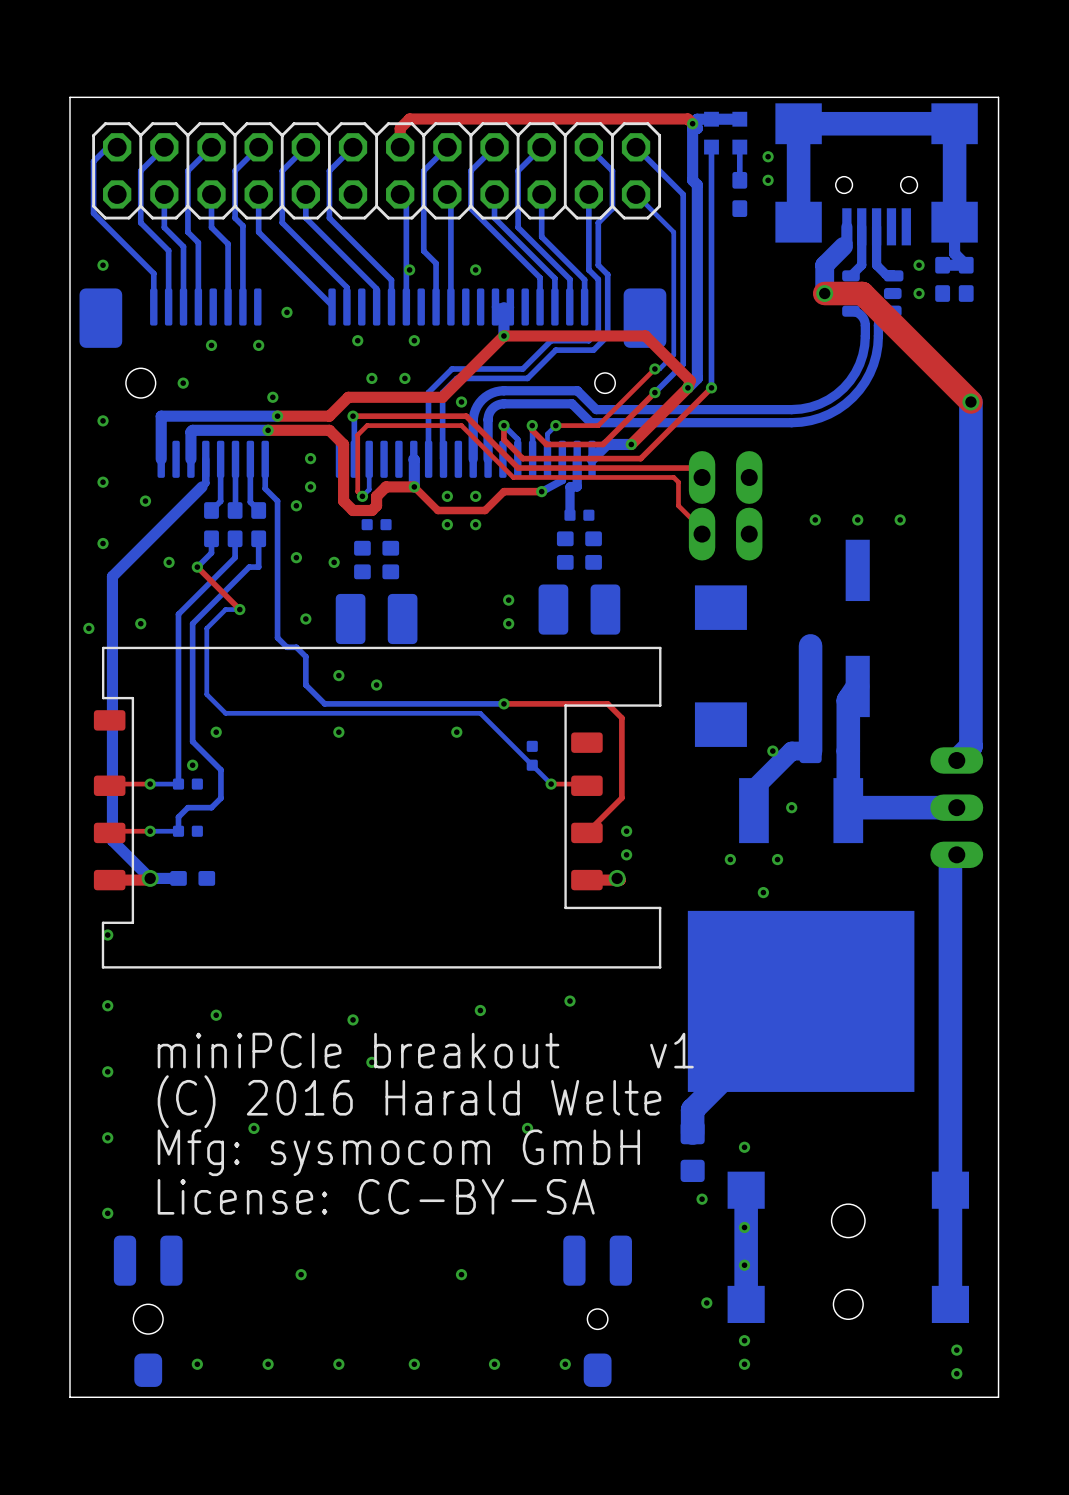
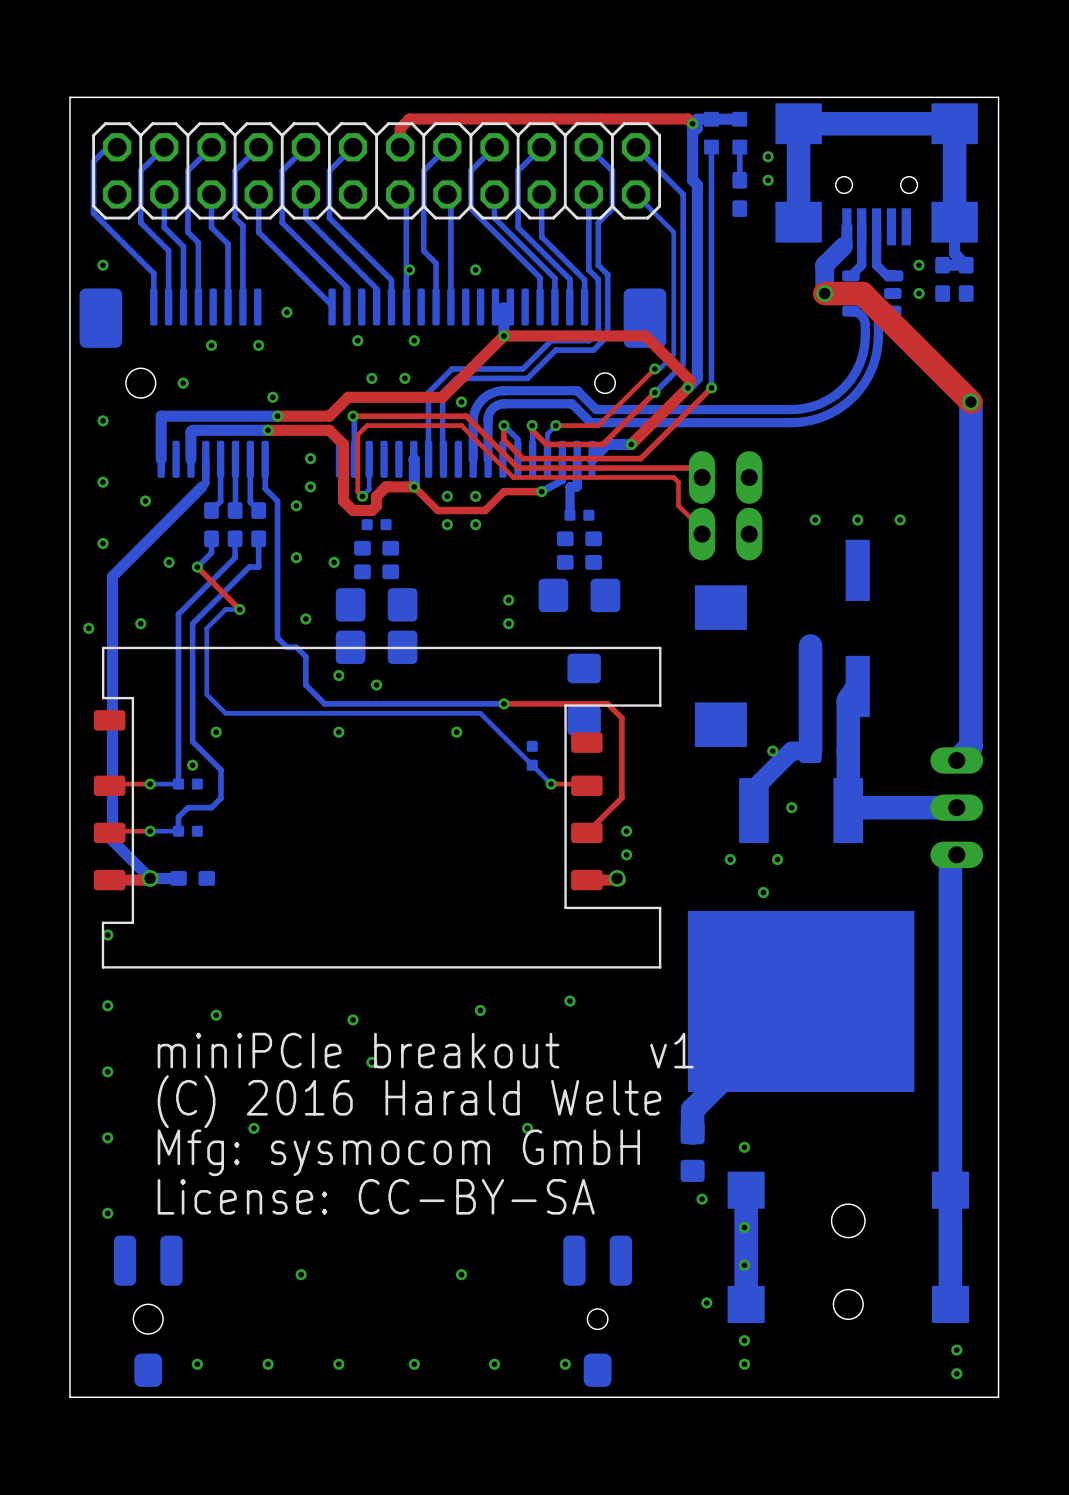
part footprint: [538, 584, 621, 635] -> [538, 578, 621, 613]
part: none -> (376, 604)
part: (376, 618) -> none
part: none -> (376, 647)
part: none -> (584, 694)

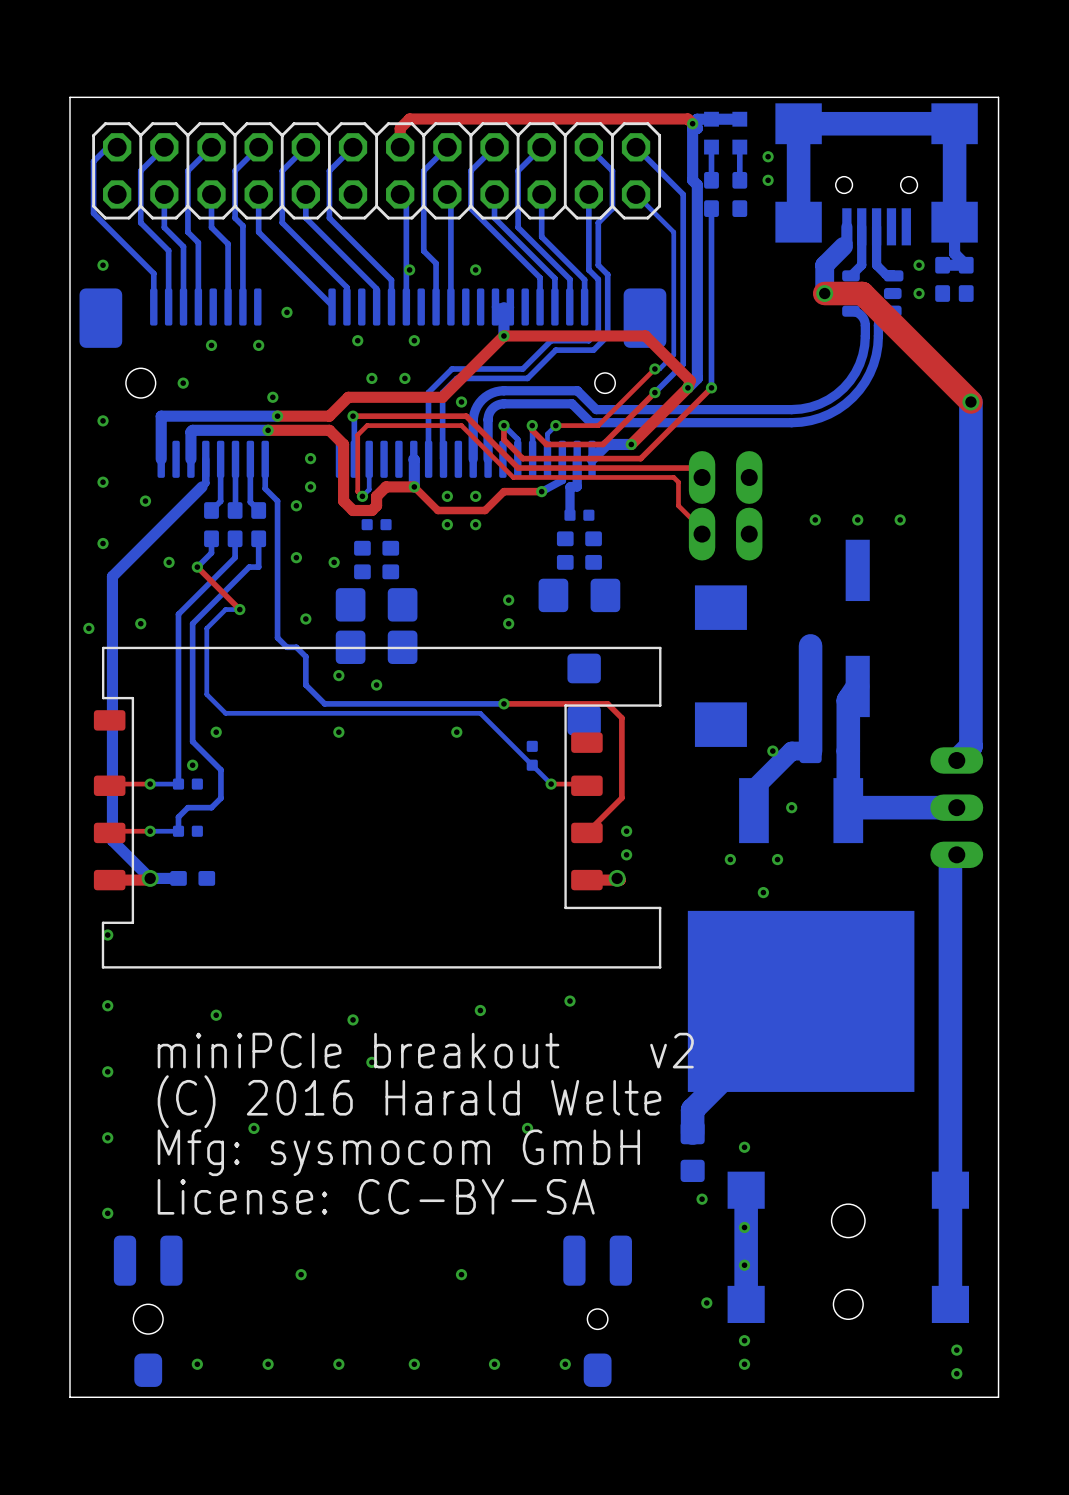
bottom track: (711, 180) (711, 208) -> none
part: none -> (711, 194)
text: v1 (671, 1050) -> v2 (671, 1050)

